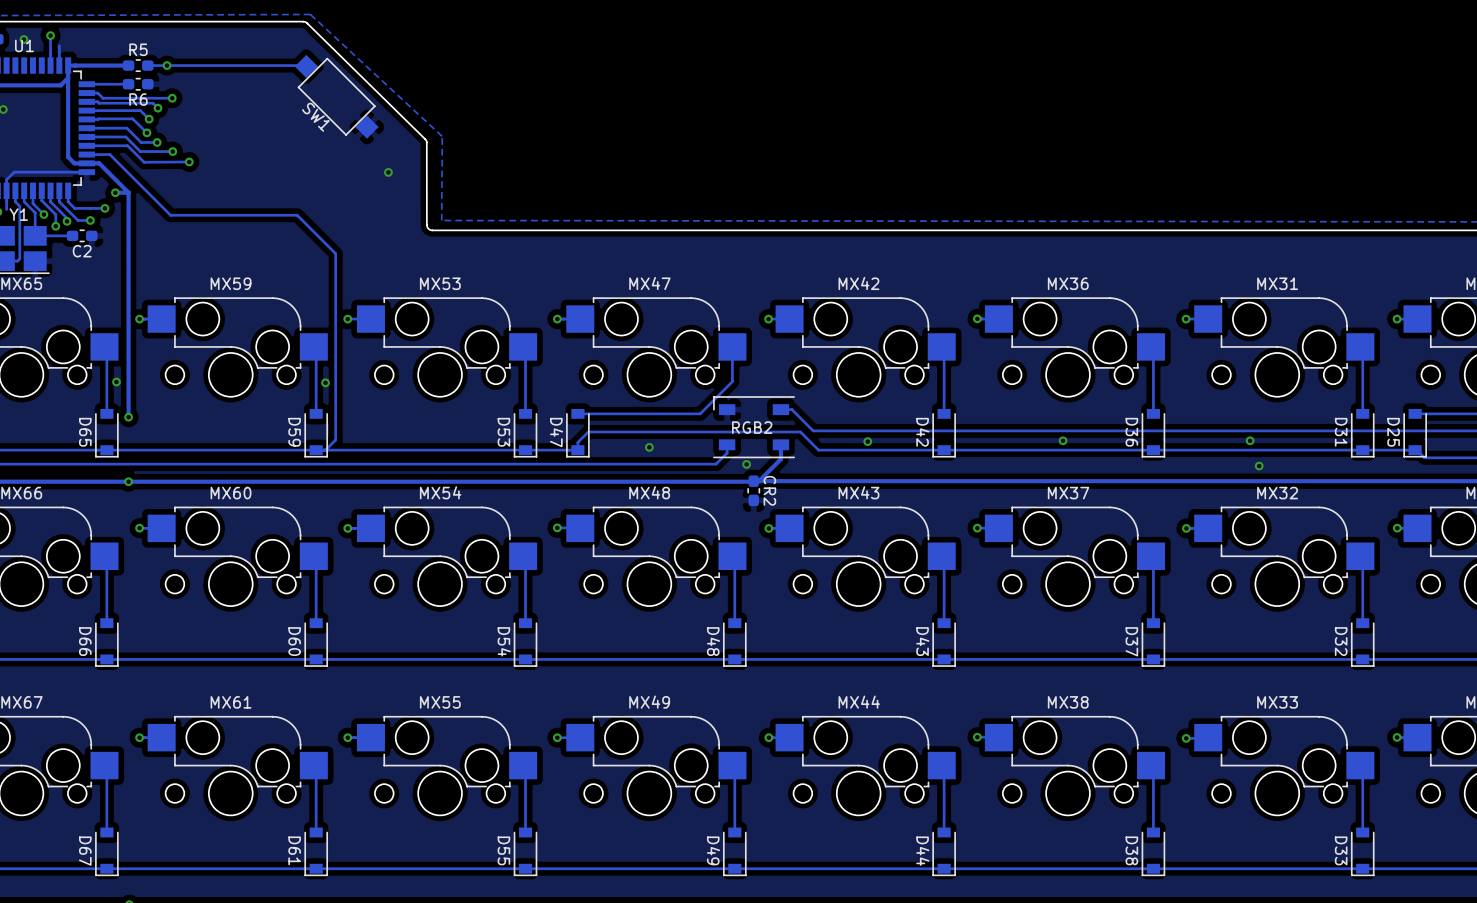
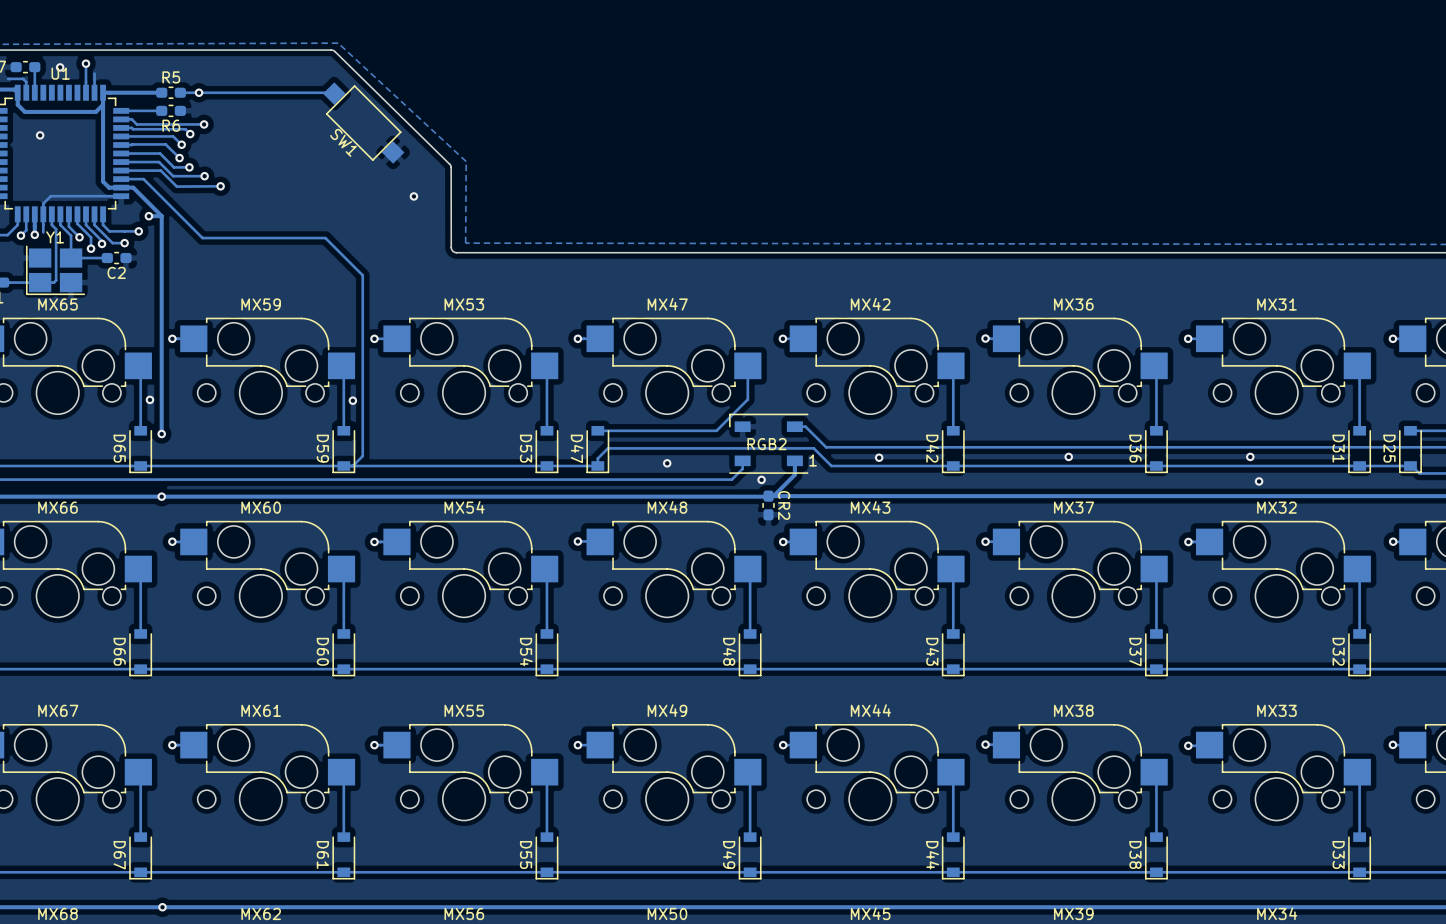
RGB2 text: none -> 1 (813, 460)

